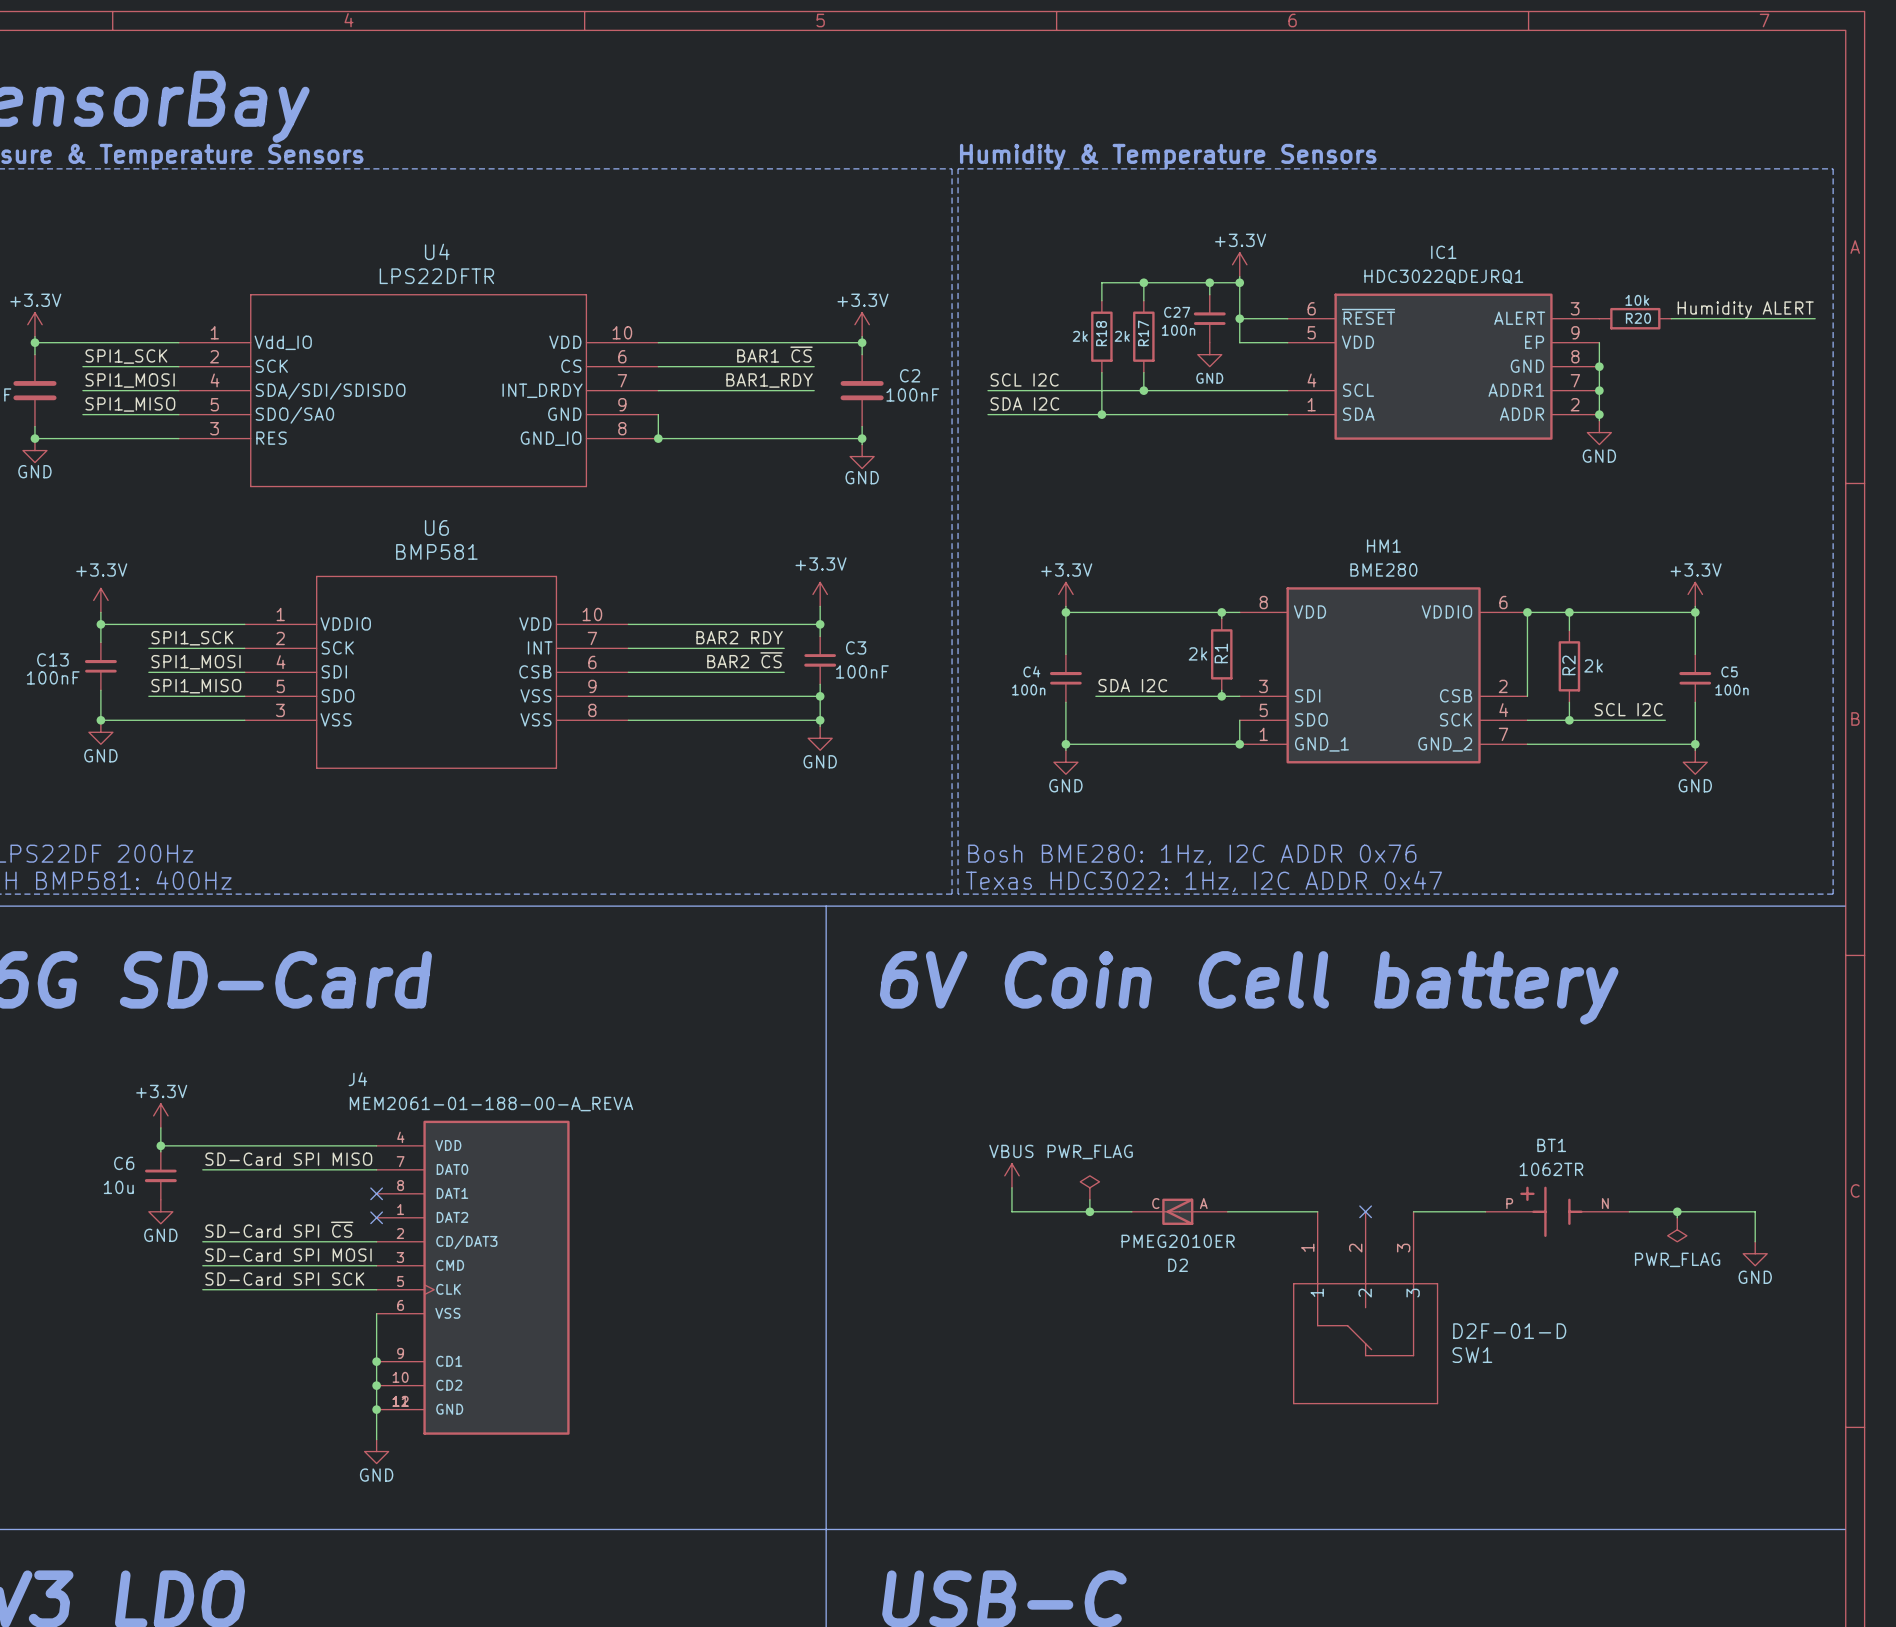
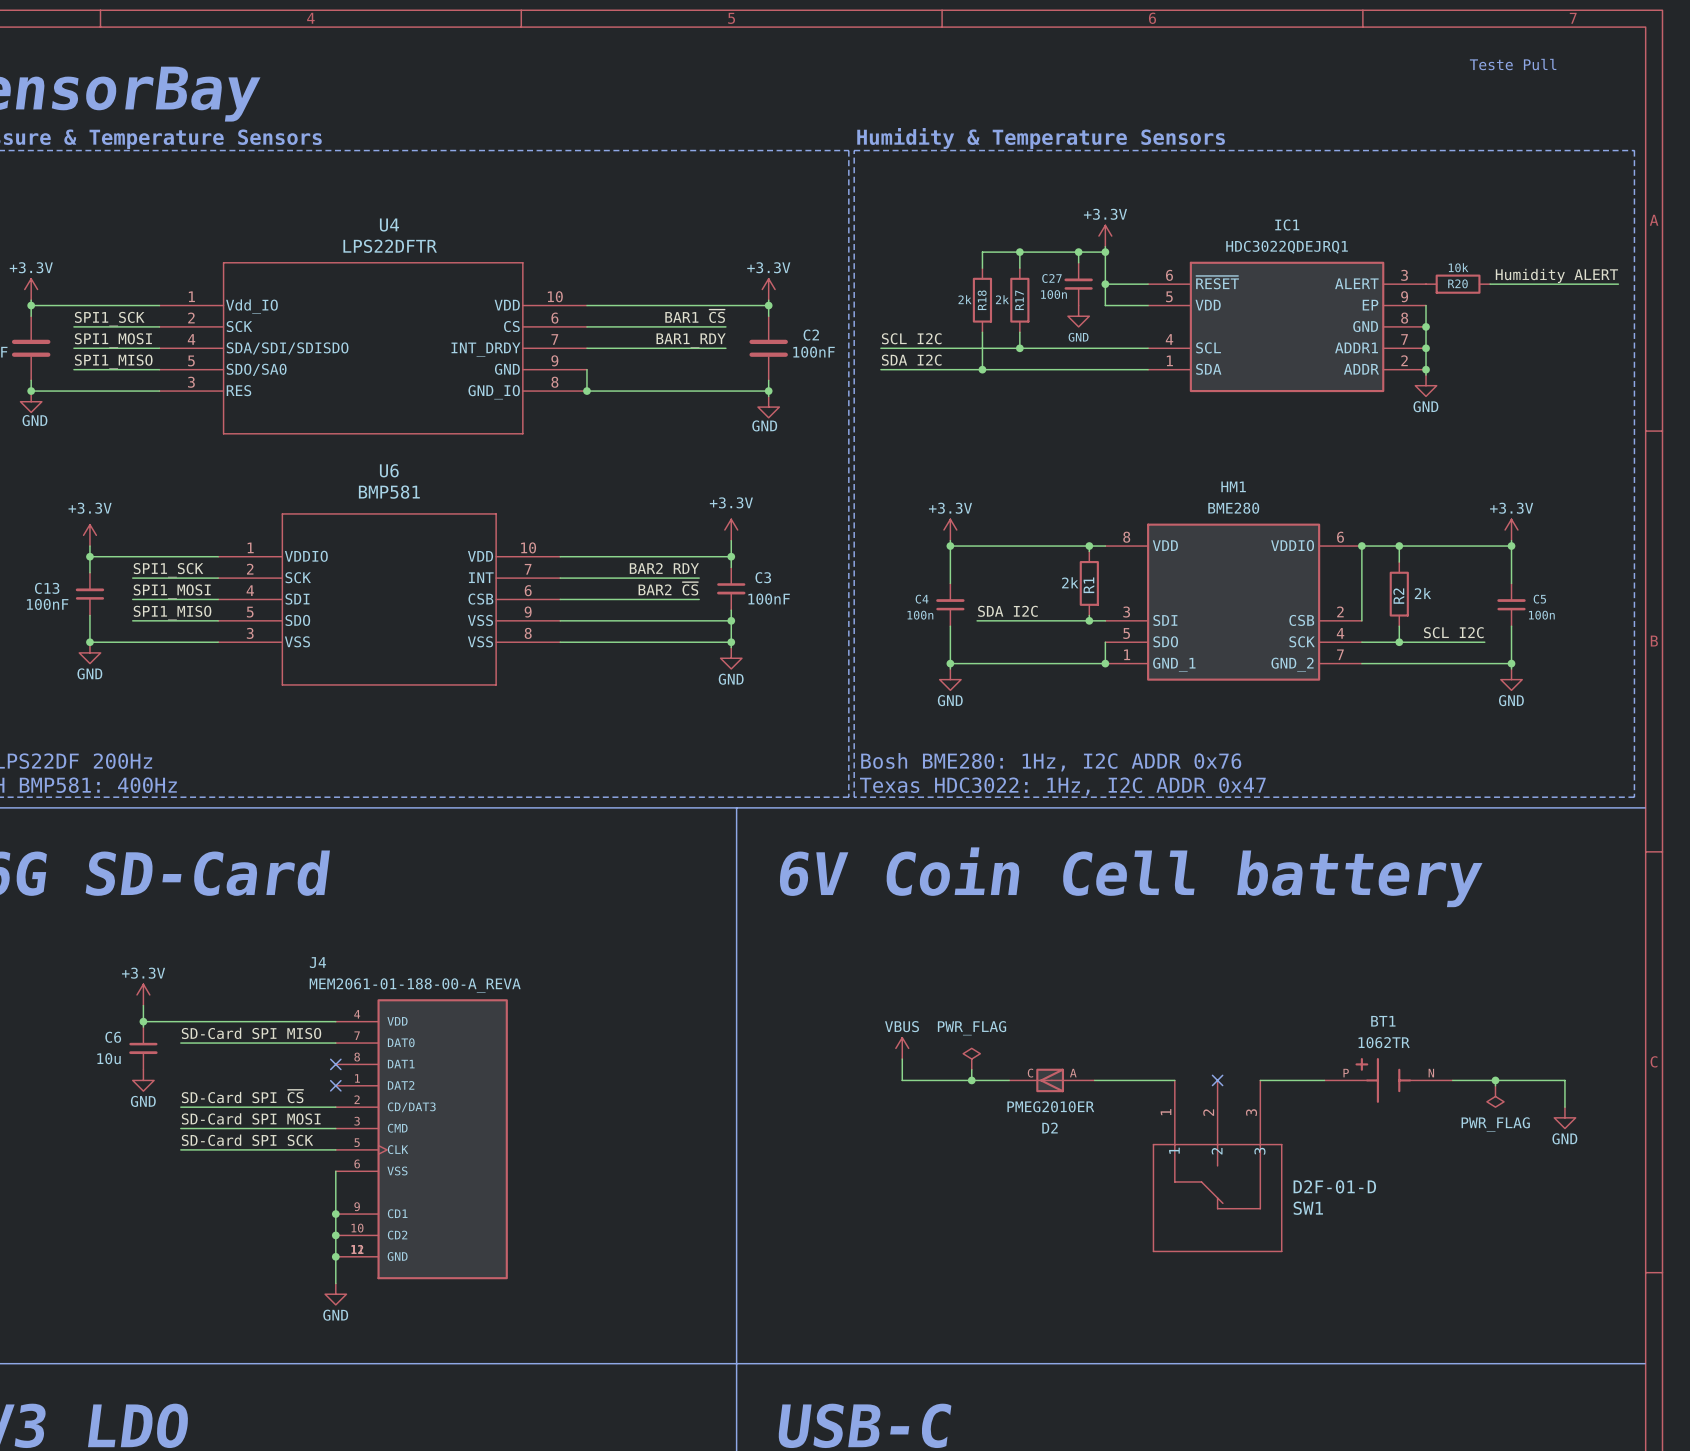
text: none -> Teste Pull (1513, 64)

